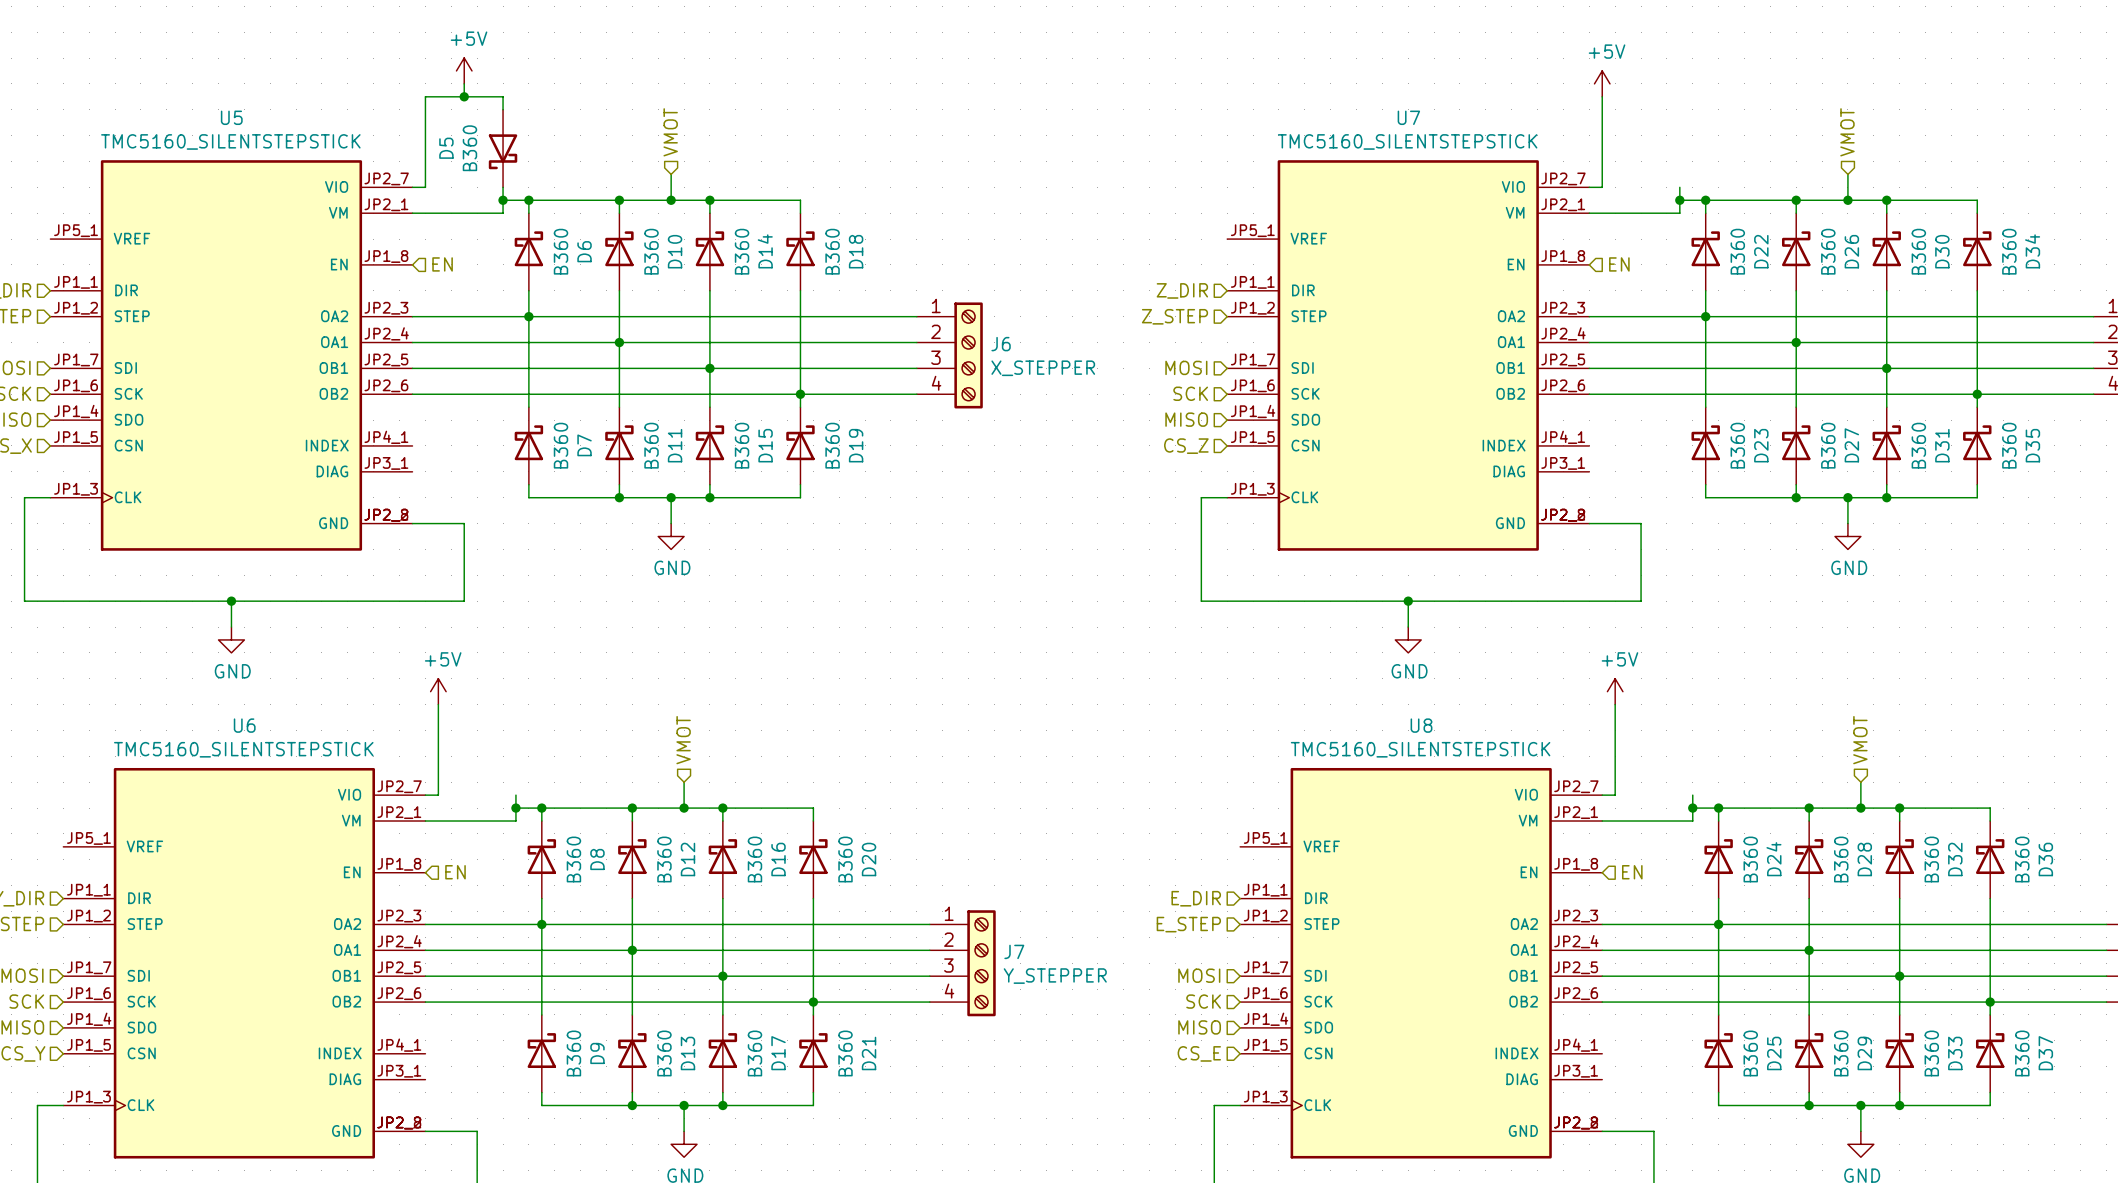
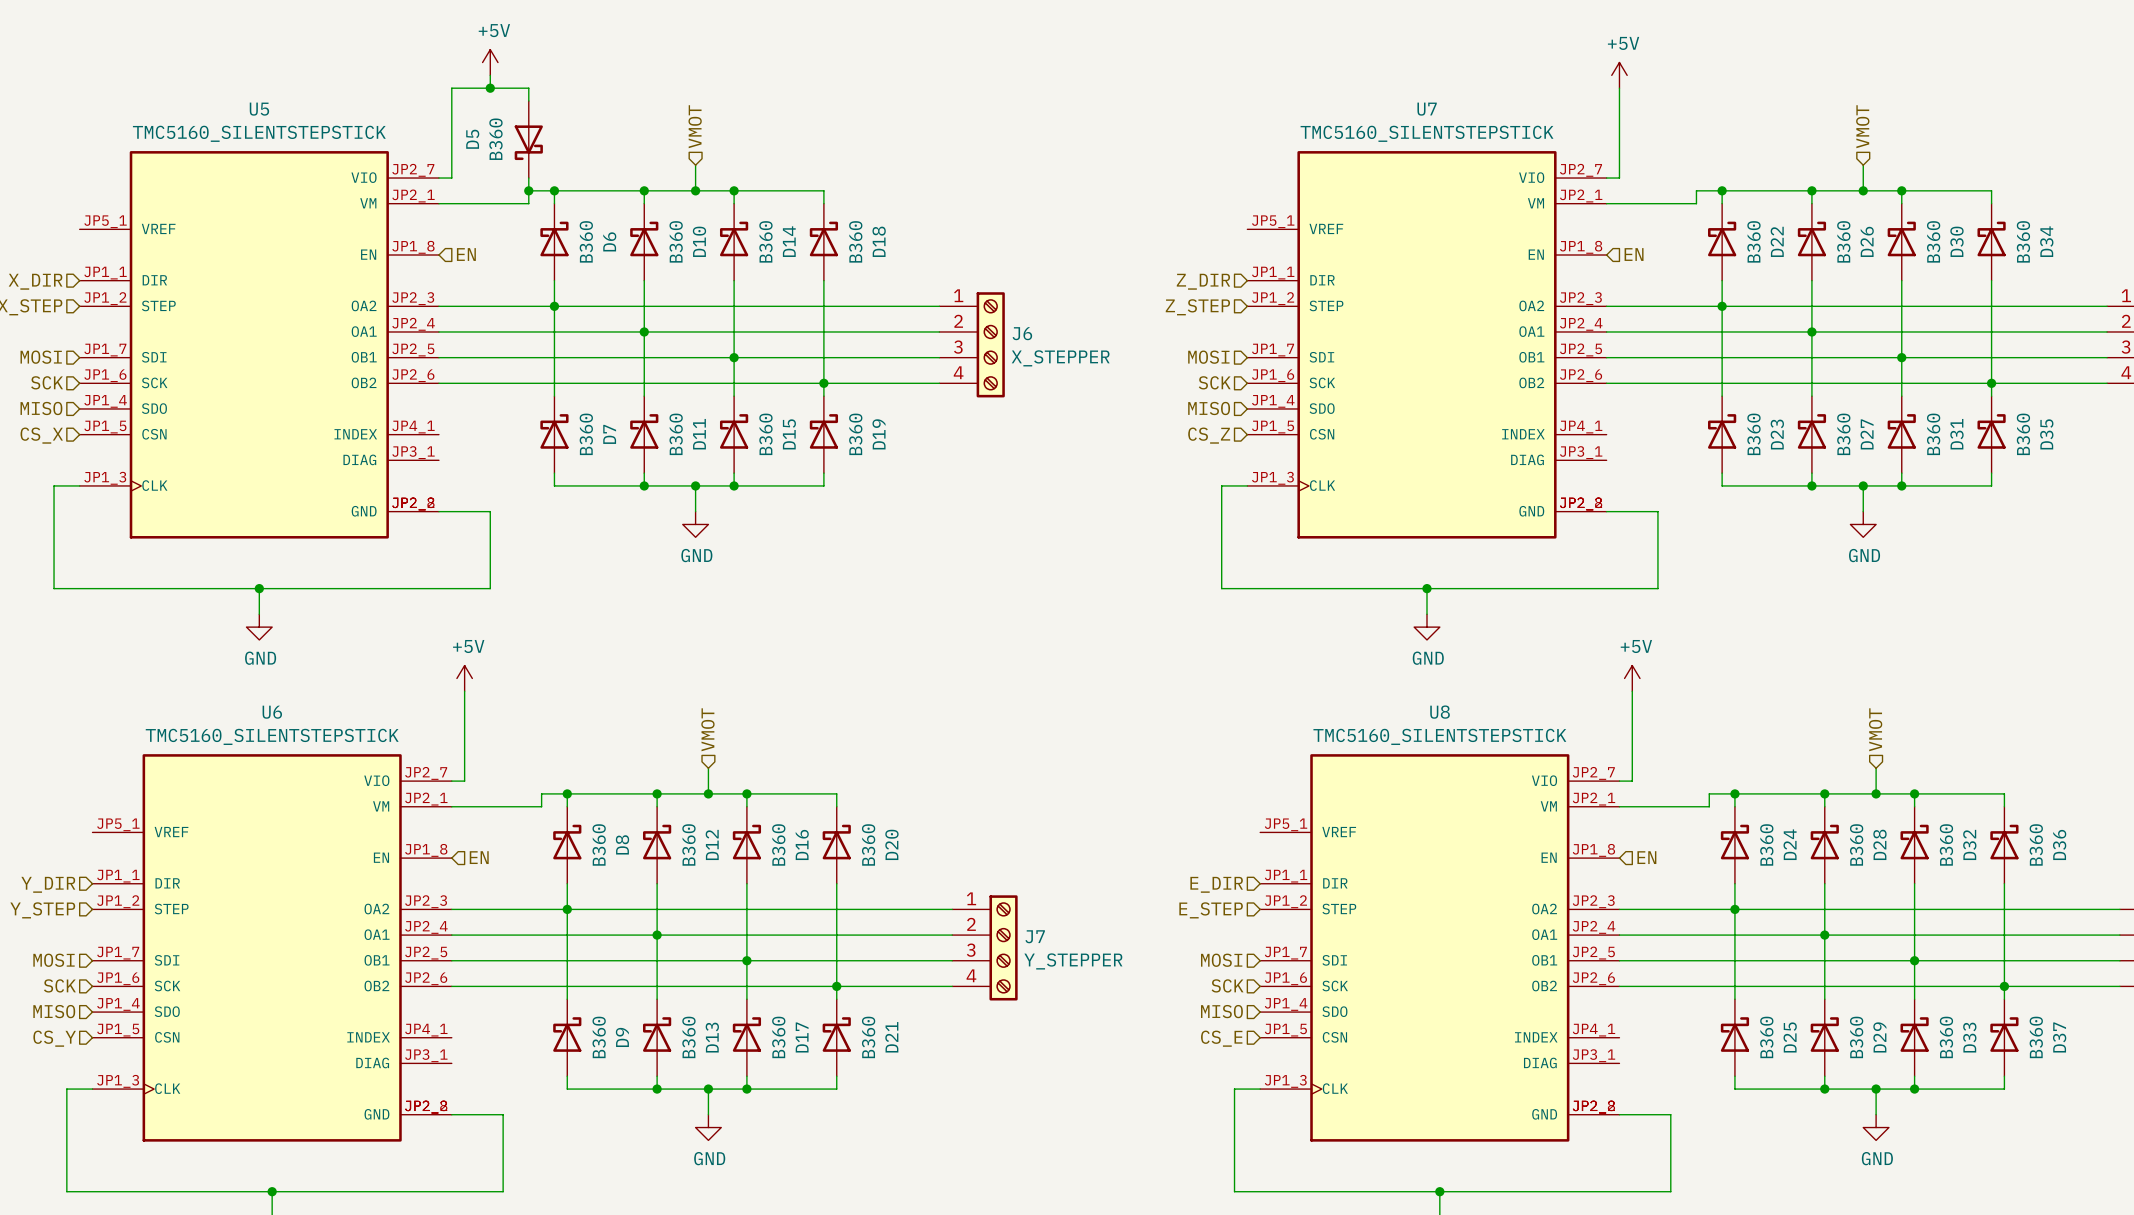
wire: (1679, 187) (1679, 200) -> none
junction: (1679, 200) -> none
wire: (515, 795) (515, 808) -> none
wire: (1692, 795) (1692, 808) -> none
junction: (515, 808) -> none
junction: (1692, 808) -> none

